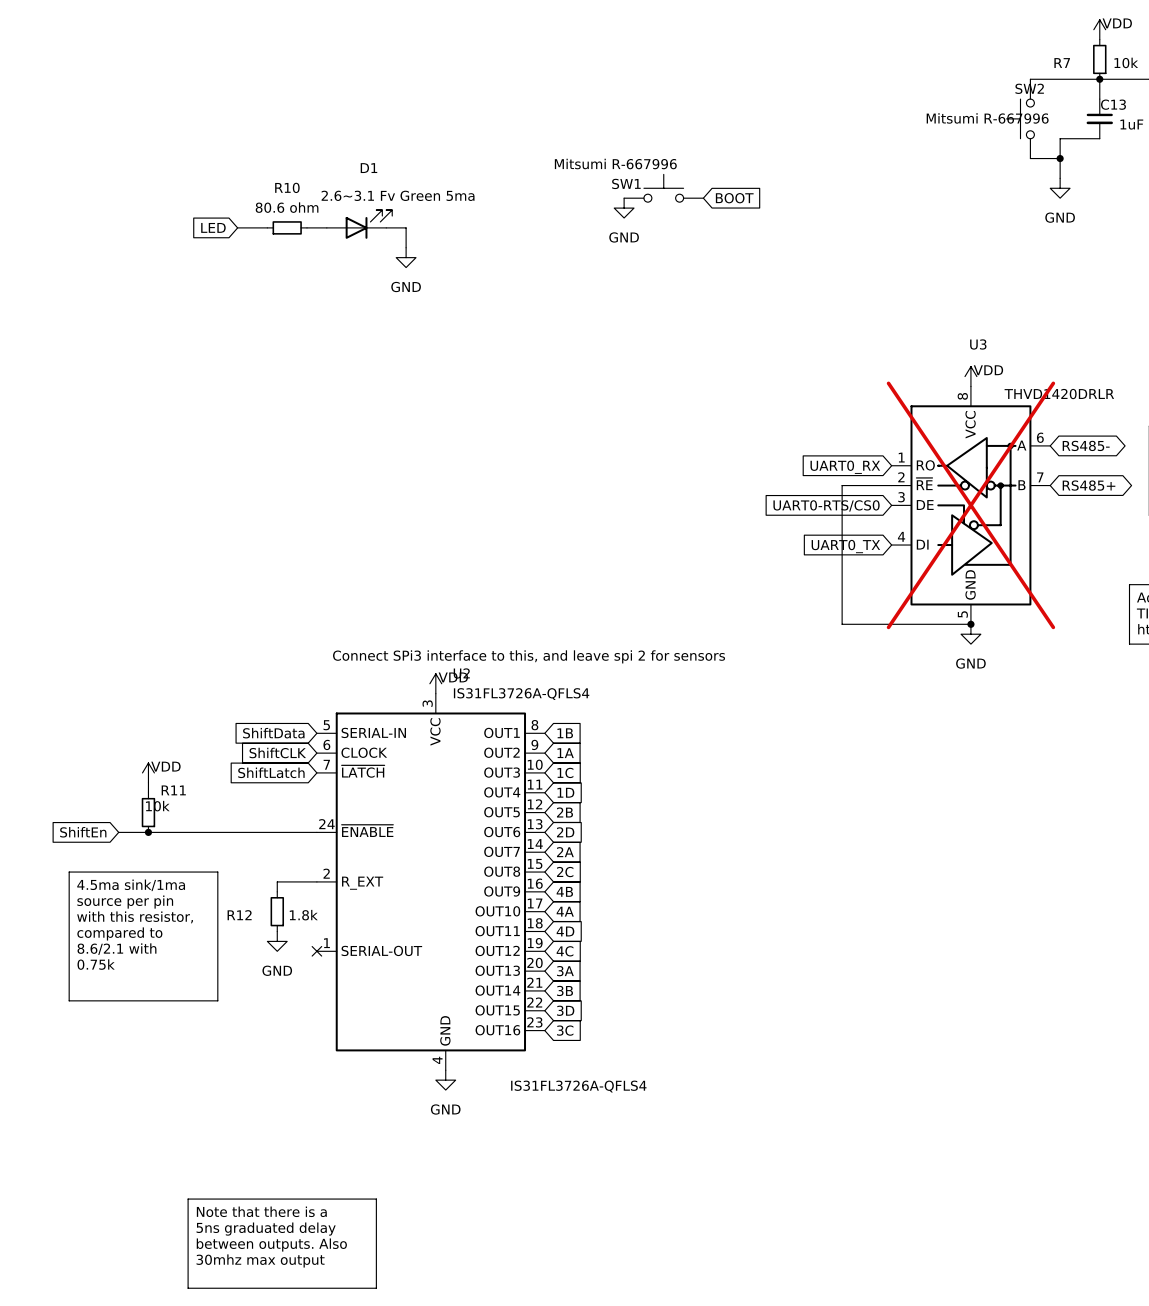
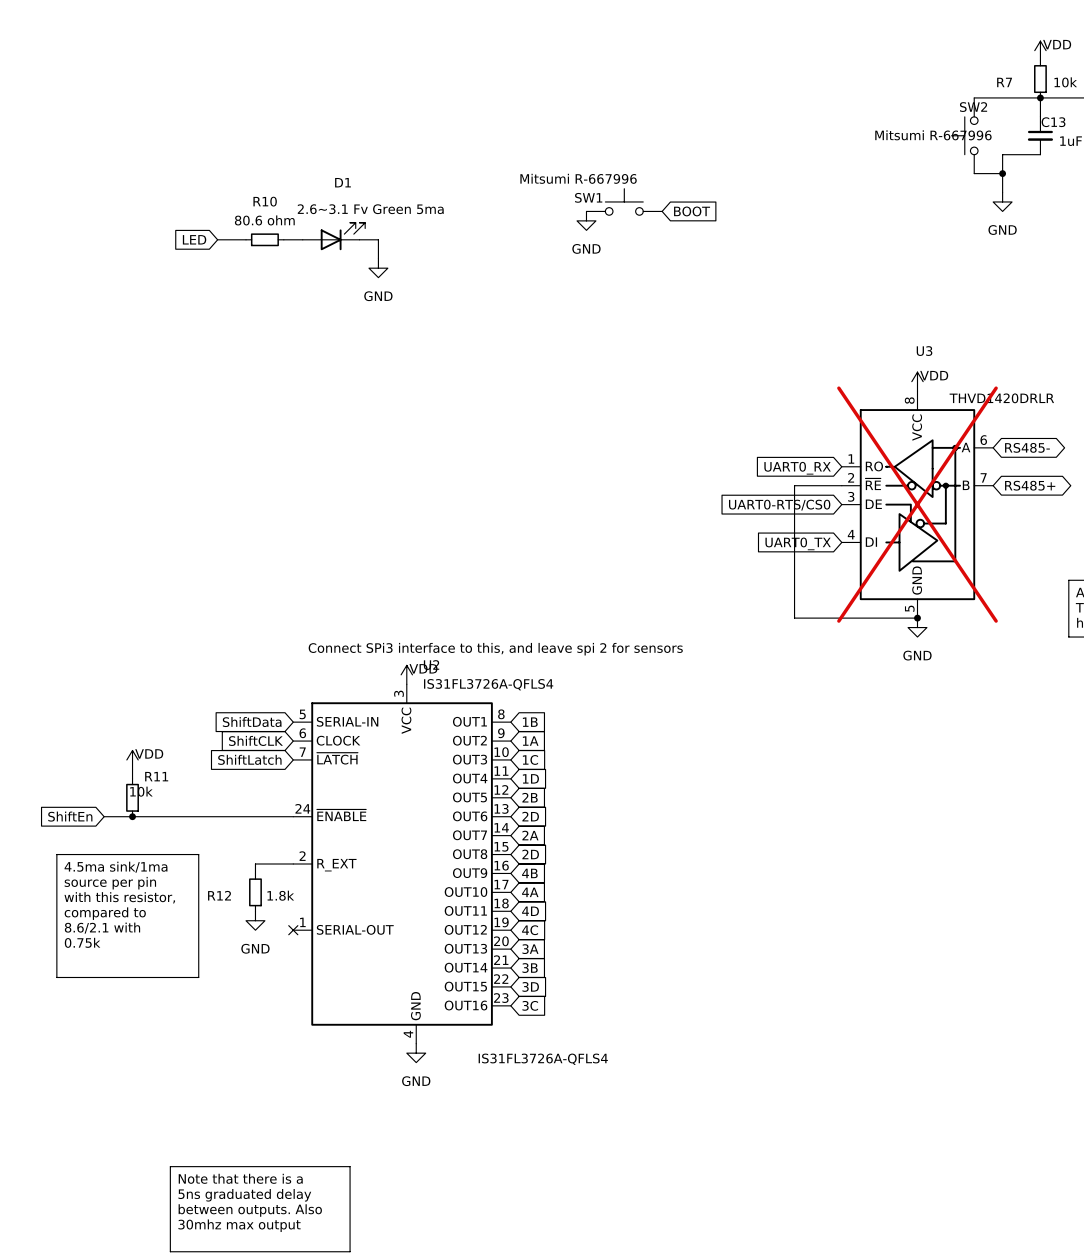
global label: 2C (565, 872) -> 2D (530, 854)

